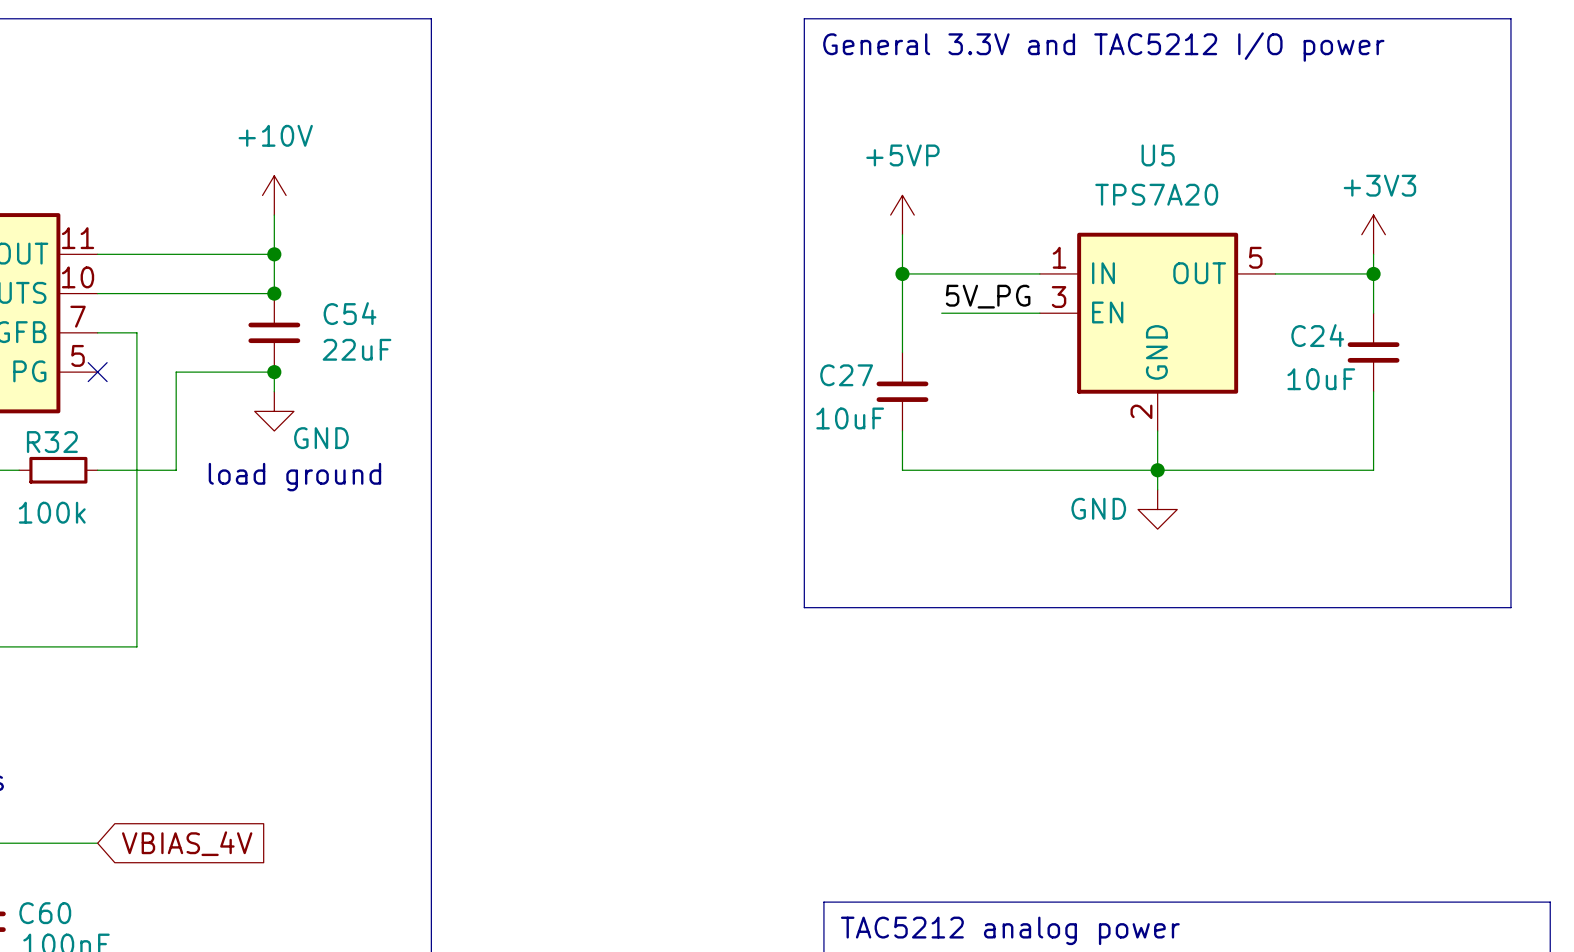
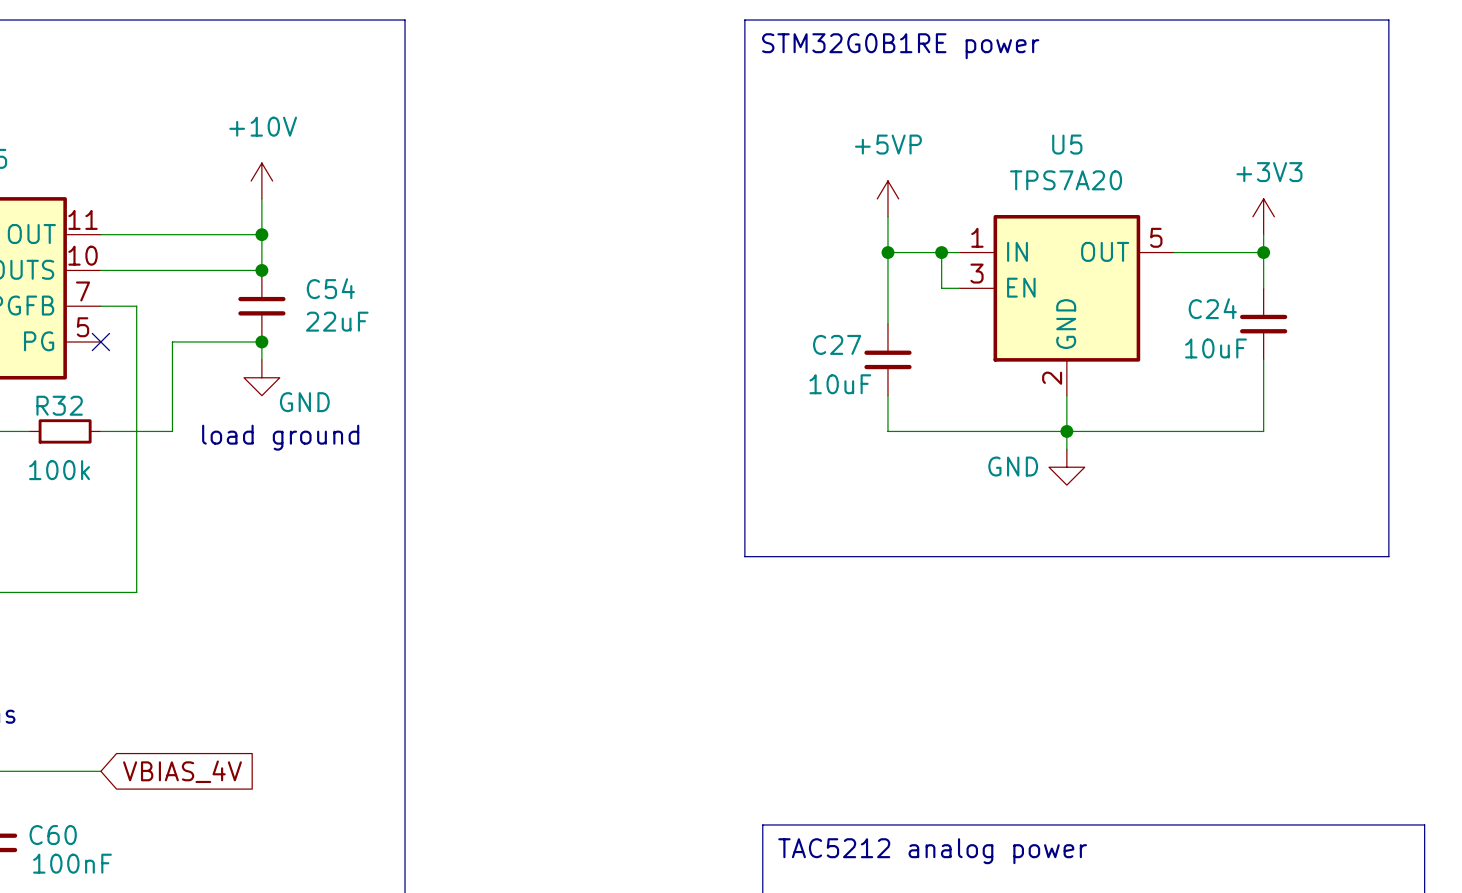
text: General 3.3V and TAC5212 I/O power (1103, 47) -> STM32G0B1RE power (900, 46)
power symbol position: +5VP (902, 215) -> +5VP (887, 198)
wire: (902, 234) (902, 352) -> (887, 216) (887, 324)
wire: (902, 273) (961, 273) -> none
junction: (902, 273) -> none
junction: none -> (887, 252)
junction: none -> (941, 252)
label: 5V_PG (988, 296) -> none
wire: (941, 313) (1020, 313) -> (941, 252) (941, 288)
C27 position: (902, 391) -> (887, 359)
wire: (902, 431) (902, 470) (961, 470) -> (887, 395) (887, 431)

